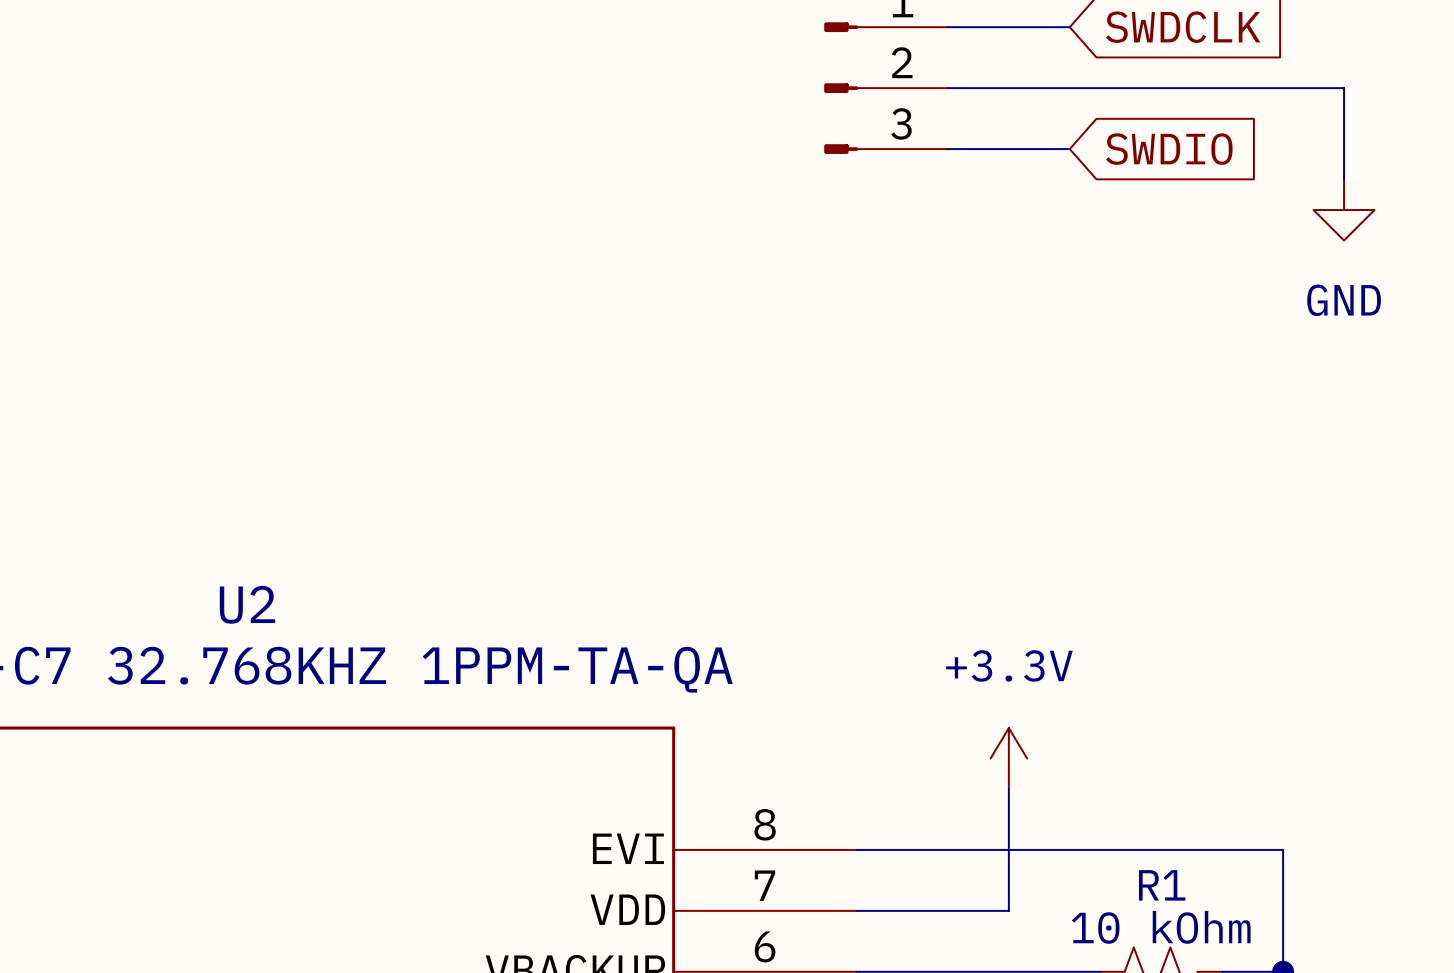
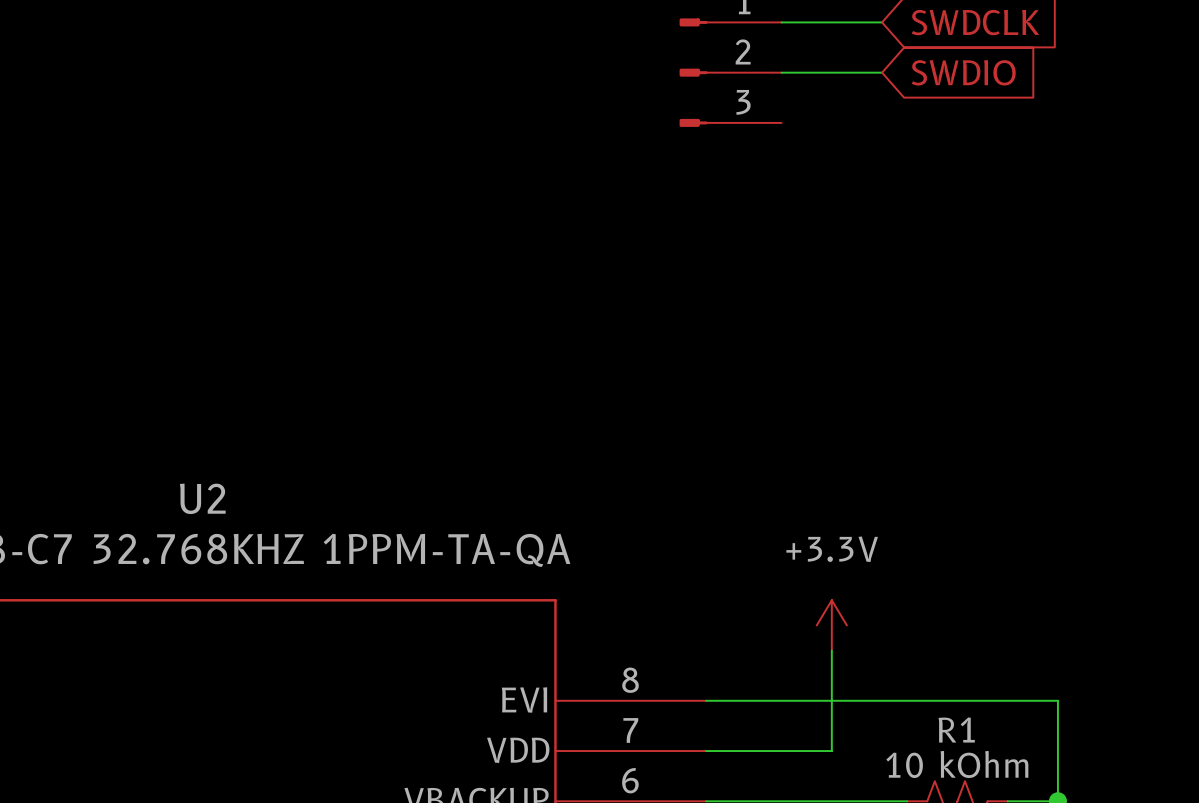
wire: (1069, 88) (1344, 88) (1344, 179) -> none
wire: (947, 149) (1069, 149) -> none
global label position: SWDIO (1169, 149) -> SWDIO (963, 72)
power symbol: GND (1344, 210) -> none

